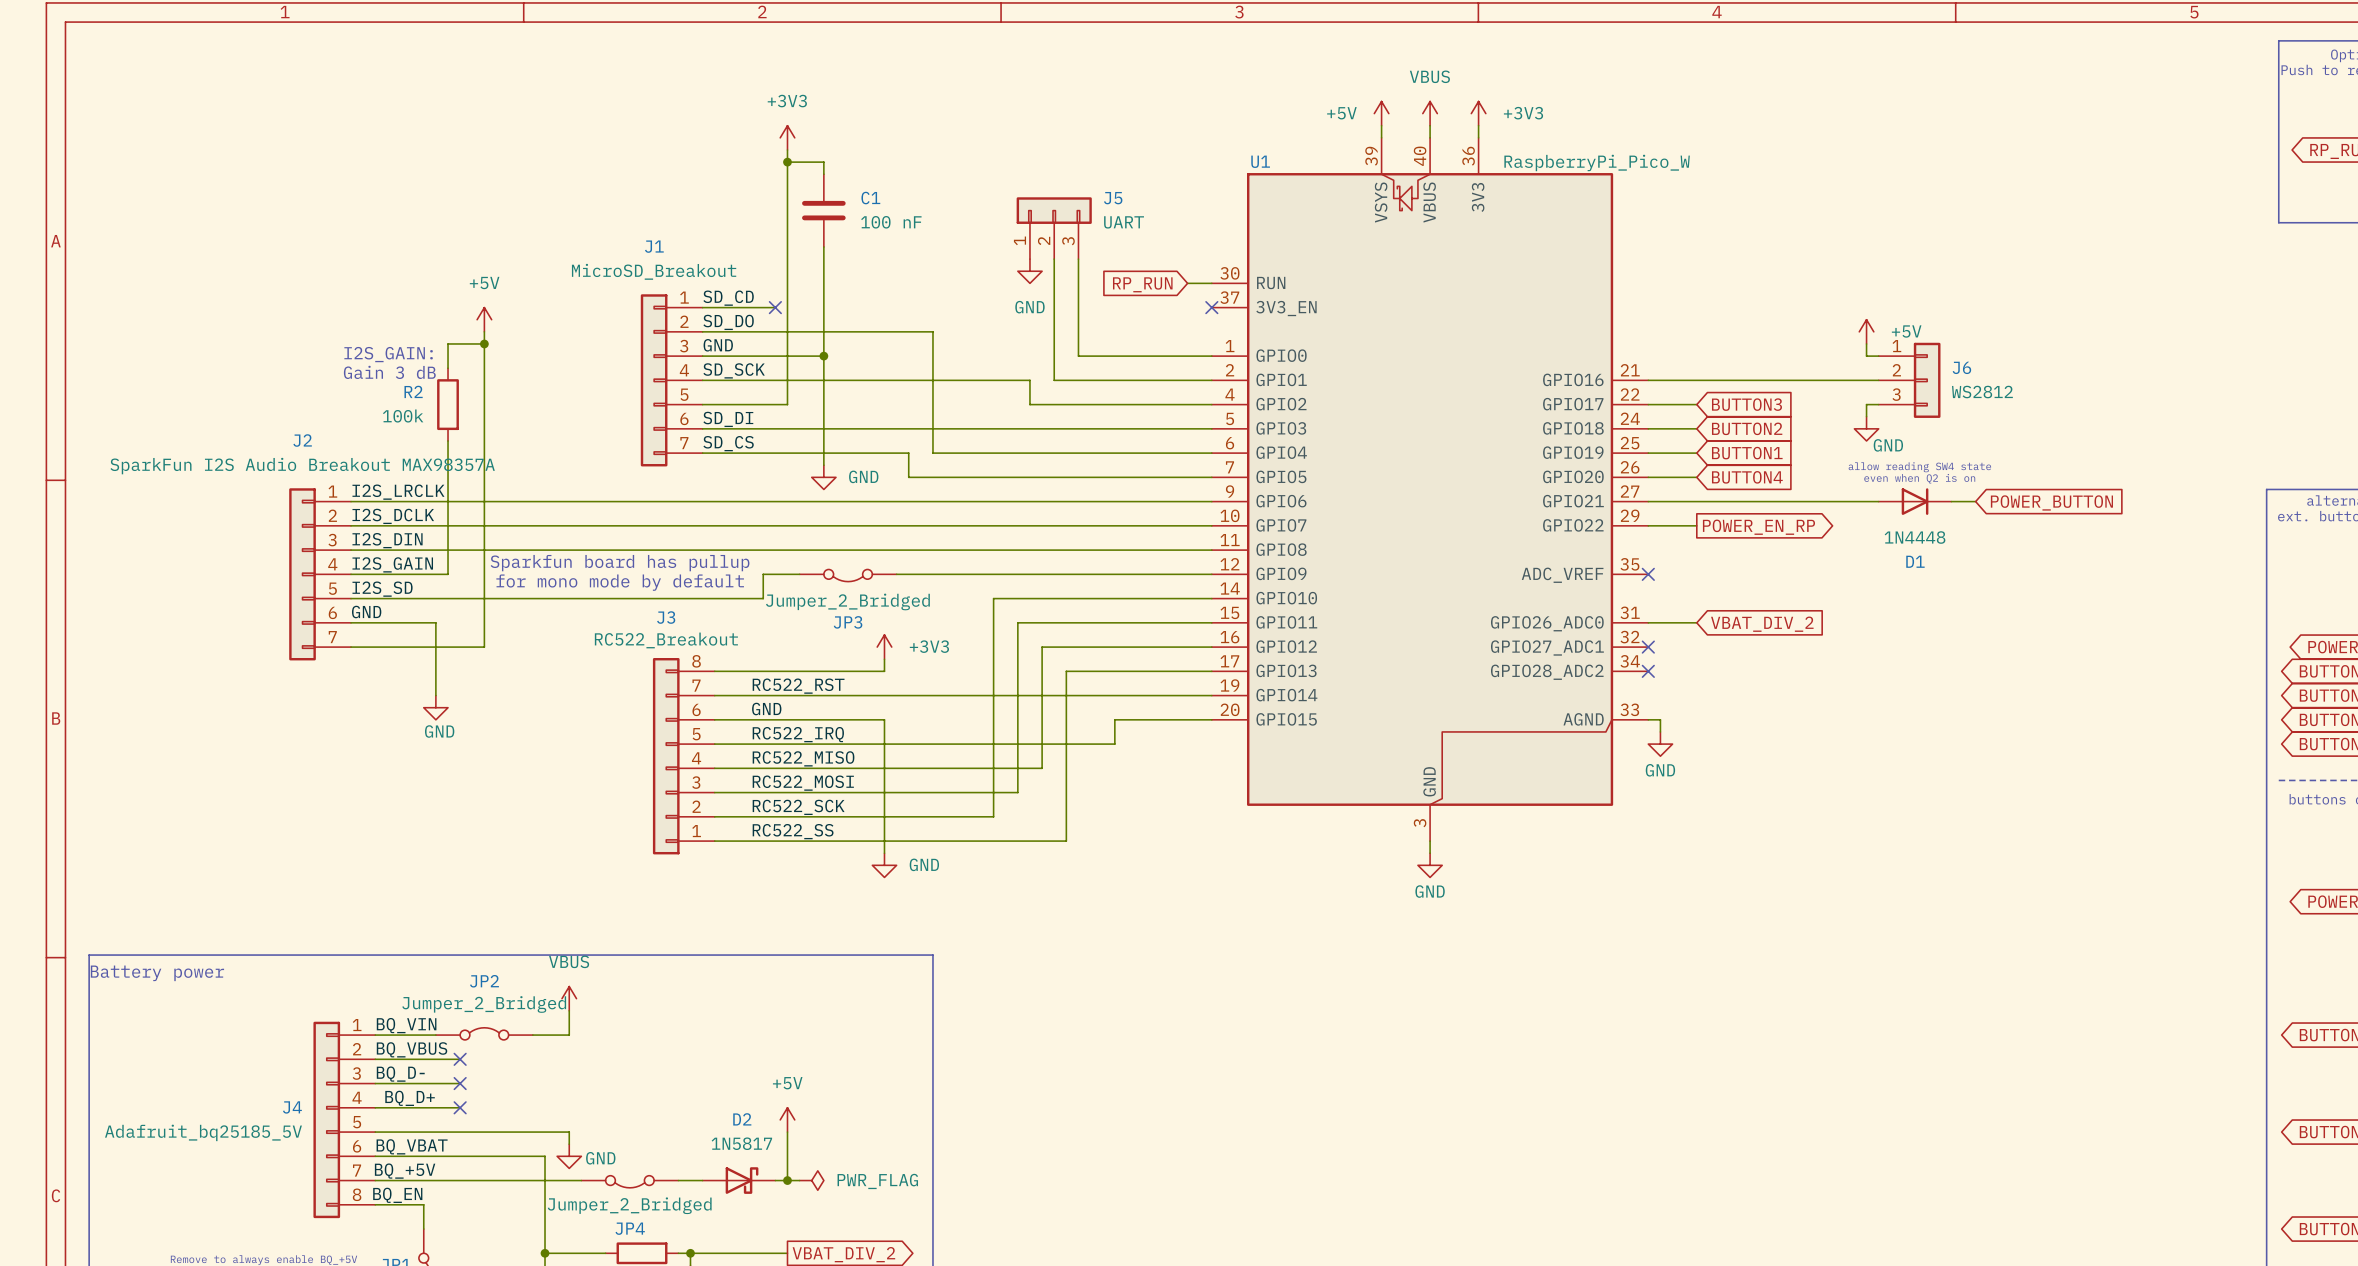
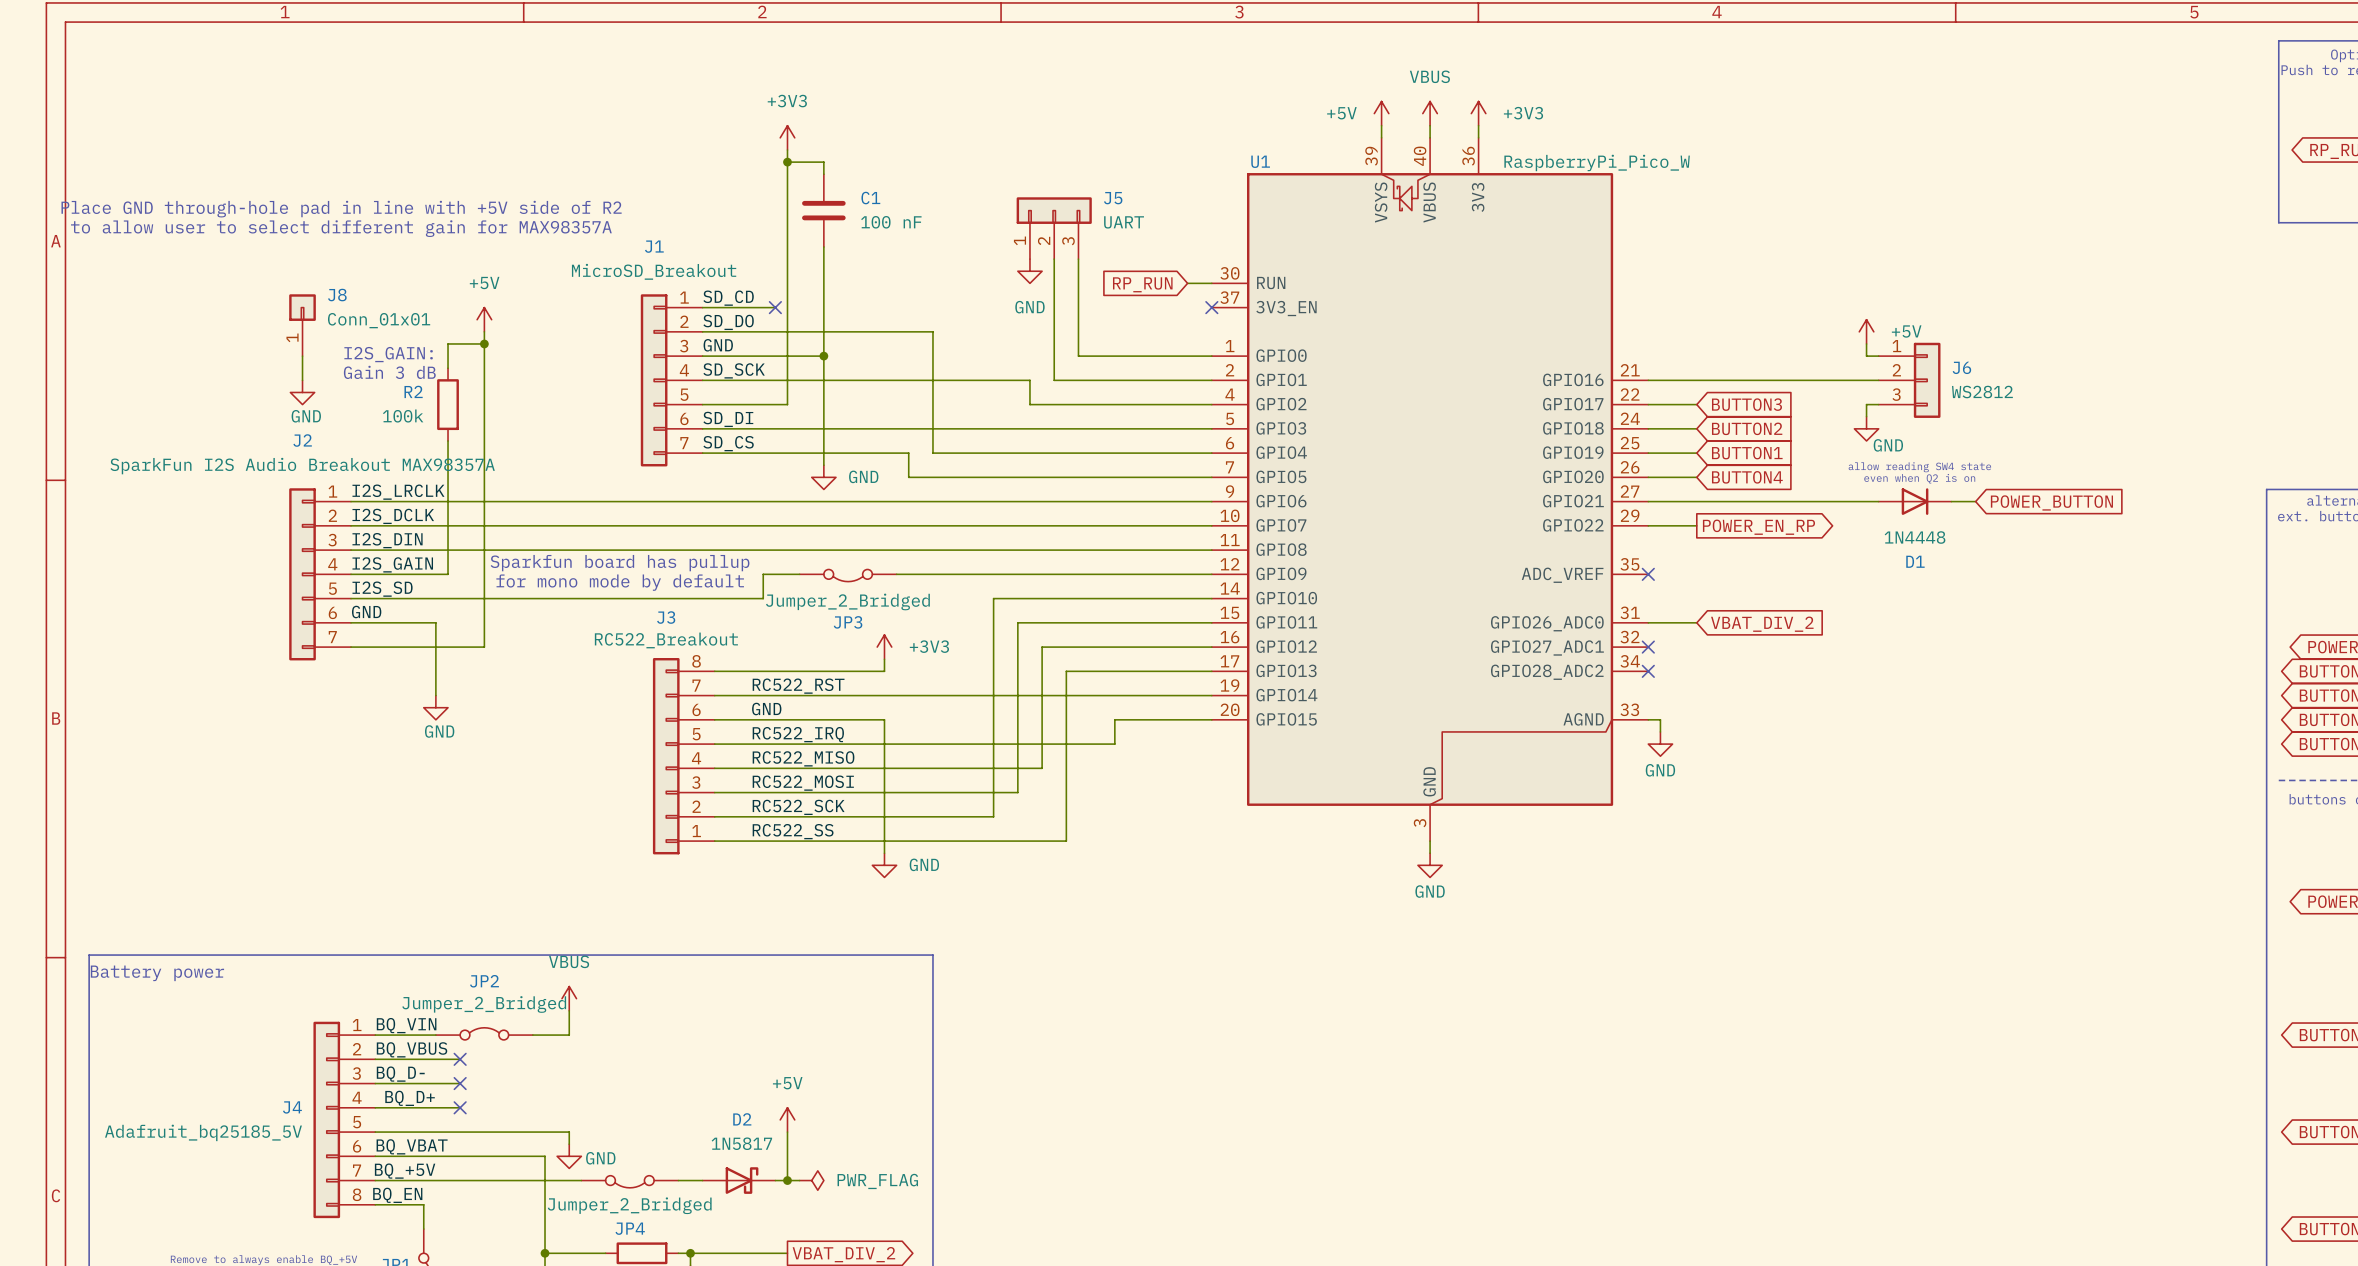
text: none -> Place GND through-hole pad in line with +5V side of R2 (341, 209)
text: none -> to allow user to select different gain for MAX98357A (341, 228)
J8: none -> Conn_01x01 (302, 325)
wire: none -> (302, 356) (302, 380)
power symbol: none -> GND (302, 392)

